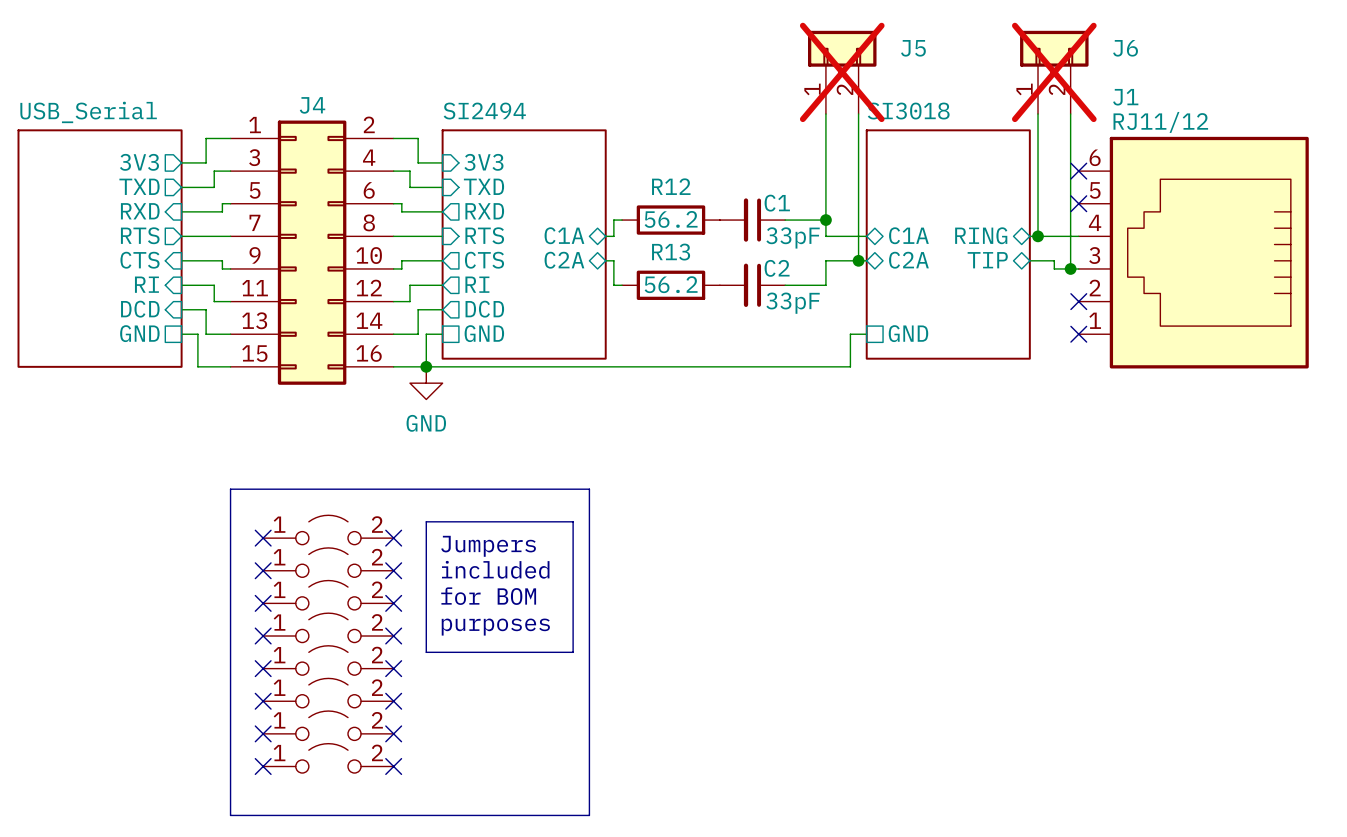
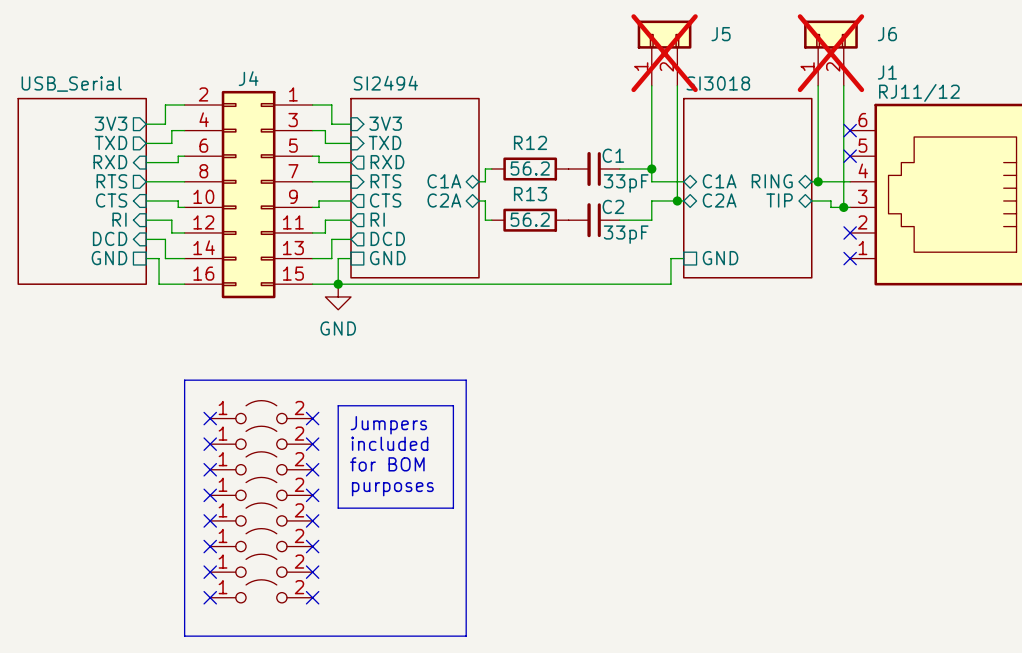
J4 flip: as is (312, 252) -> left-right (248, 194)

